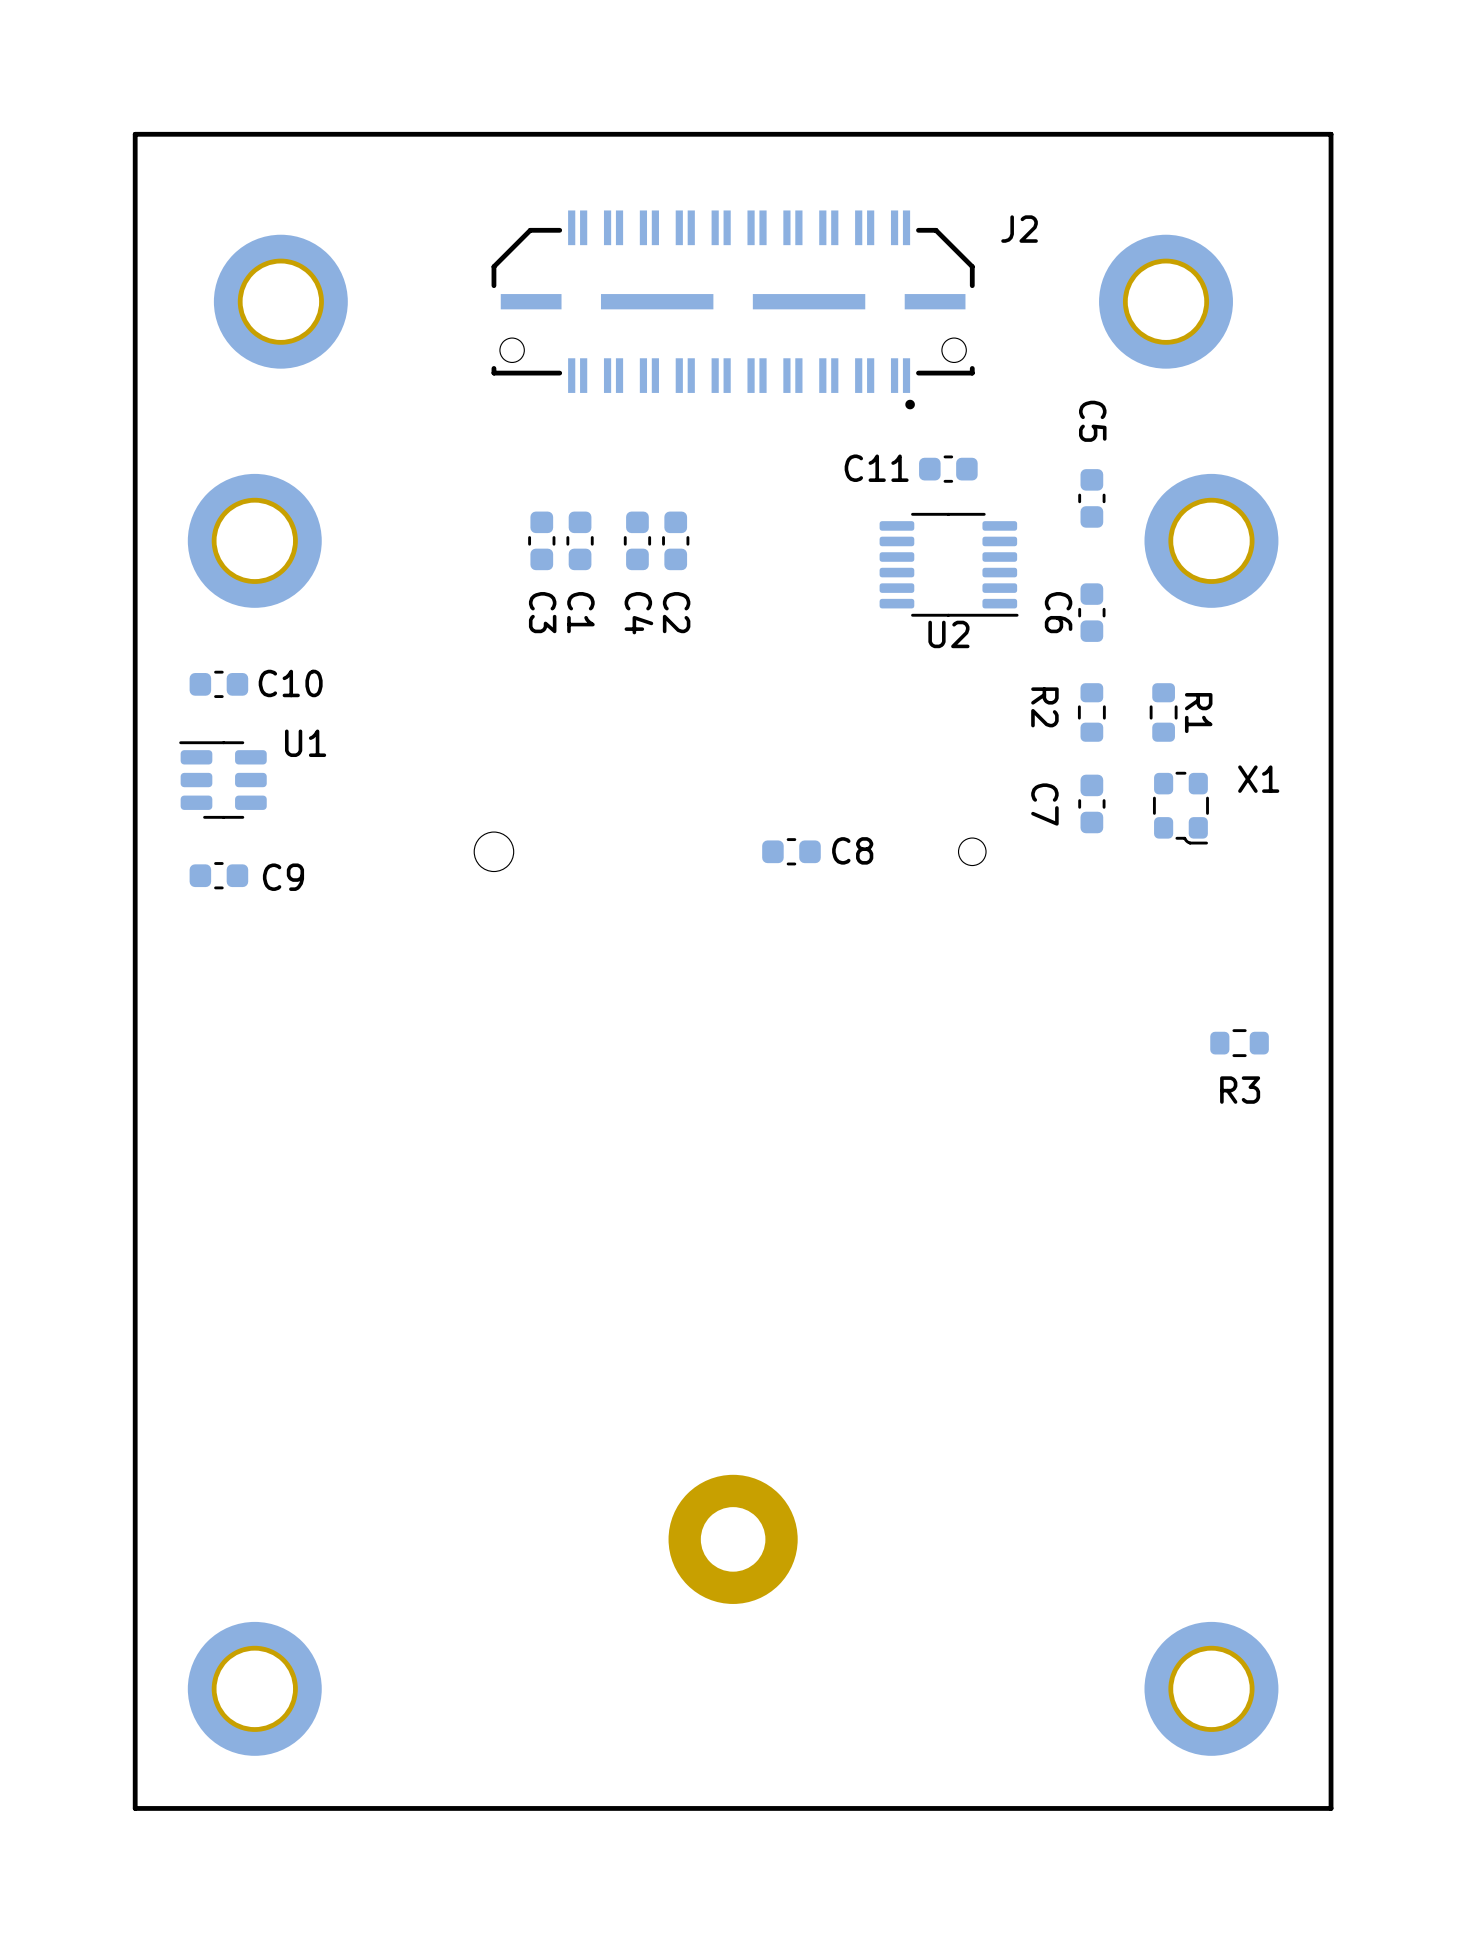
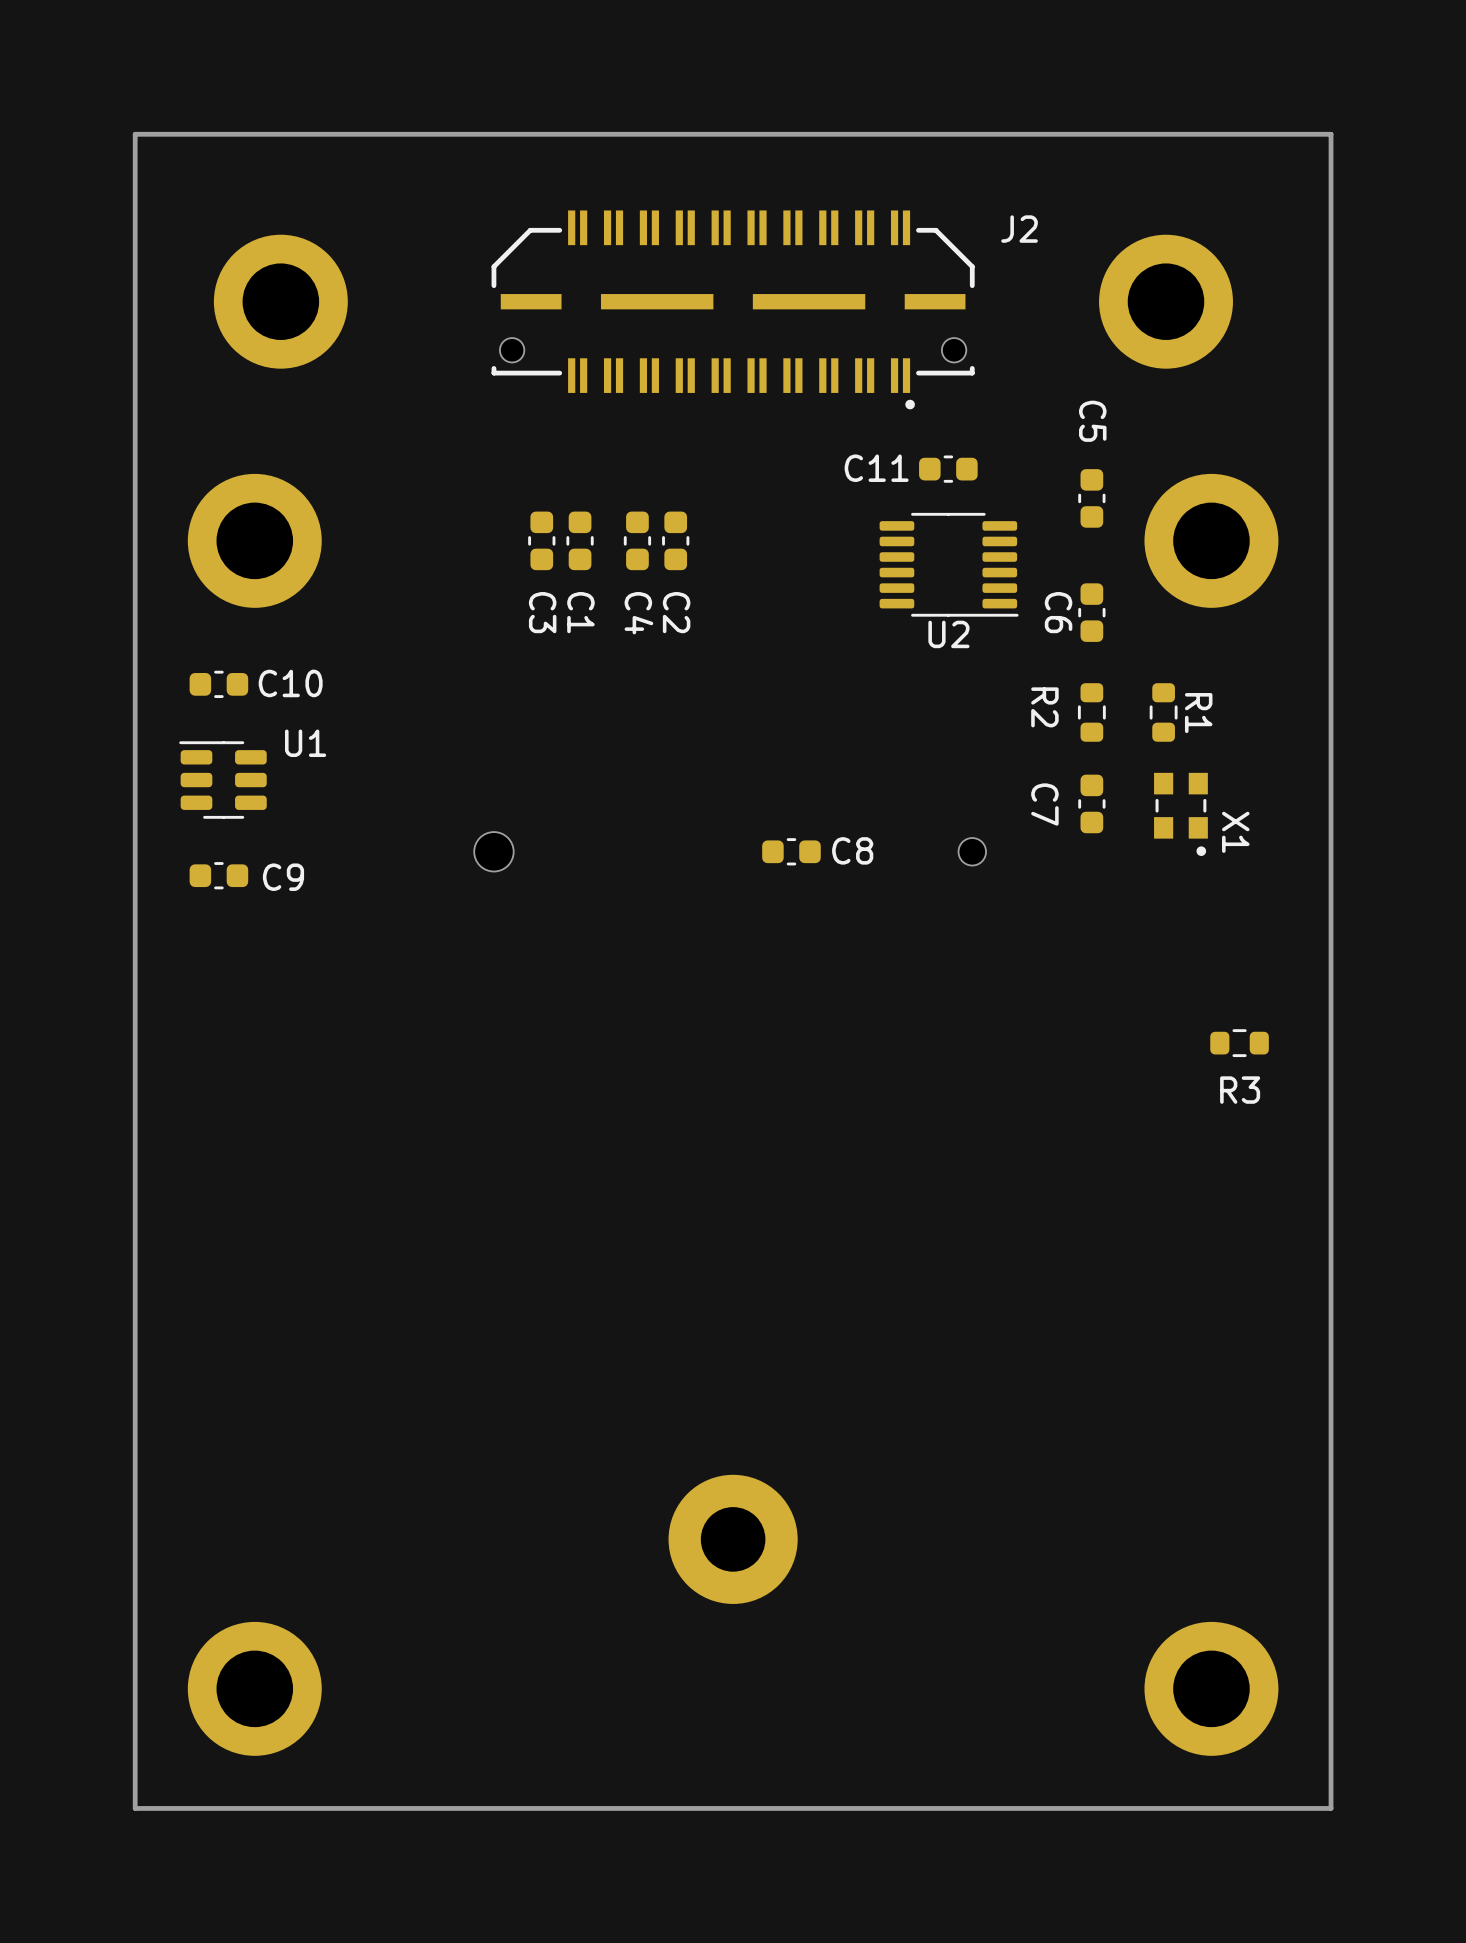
X1 footprint: [1152, 771, 1209, 845] -> [1154, 772, 1208, 856]
X1 name position: X1 (1258, 779) -> X1 (1235, 832)

